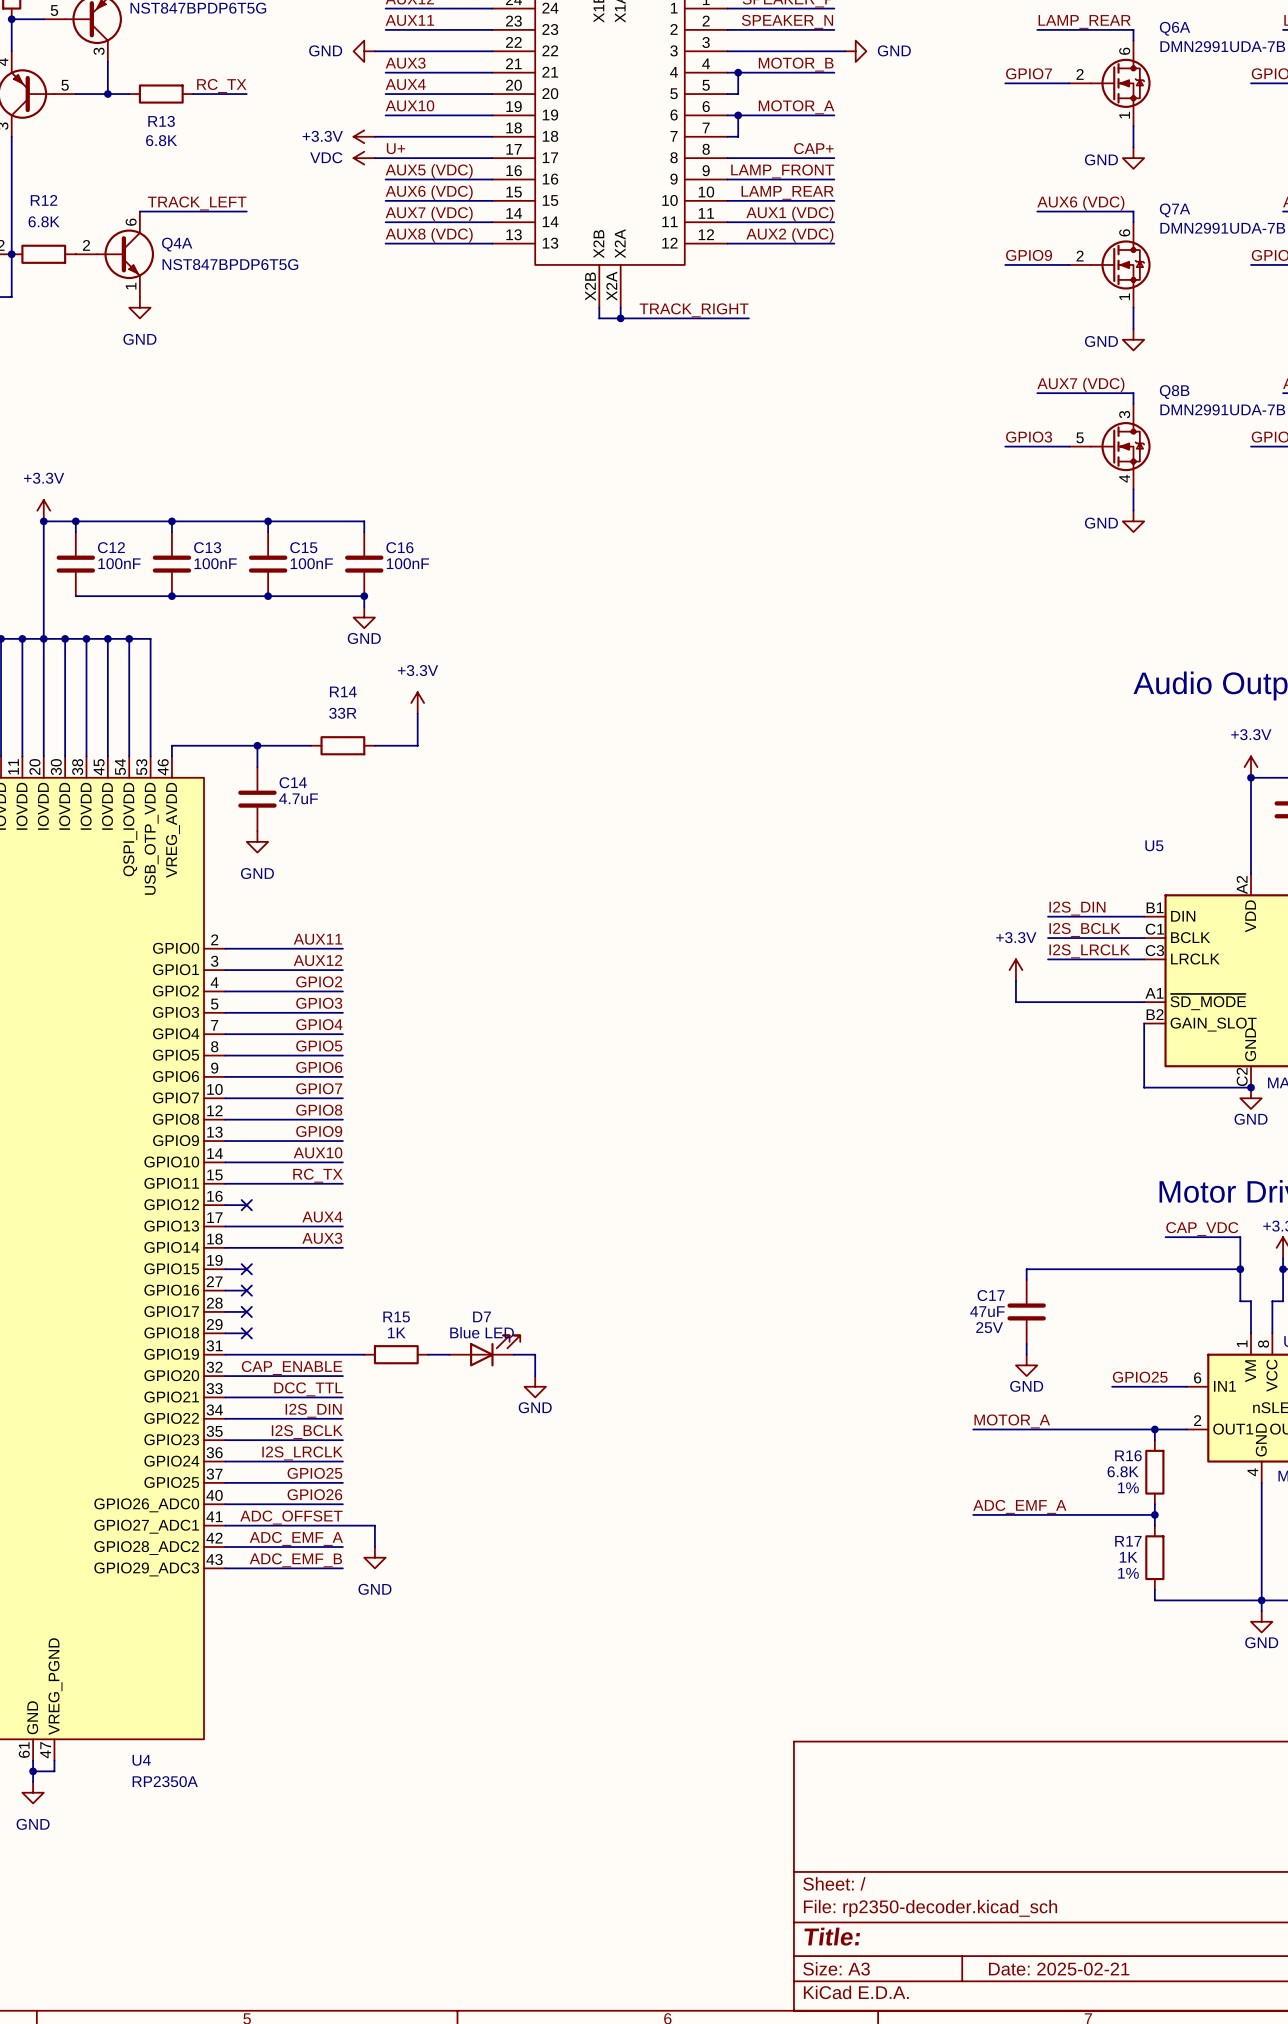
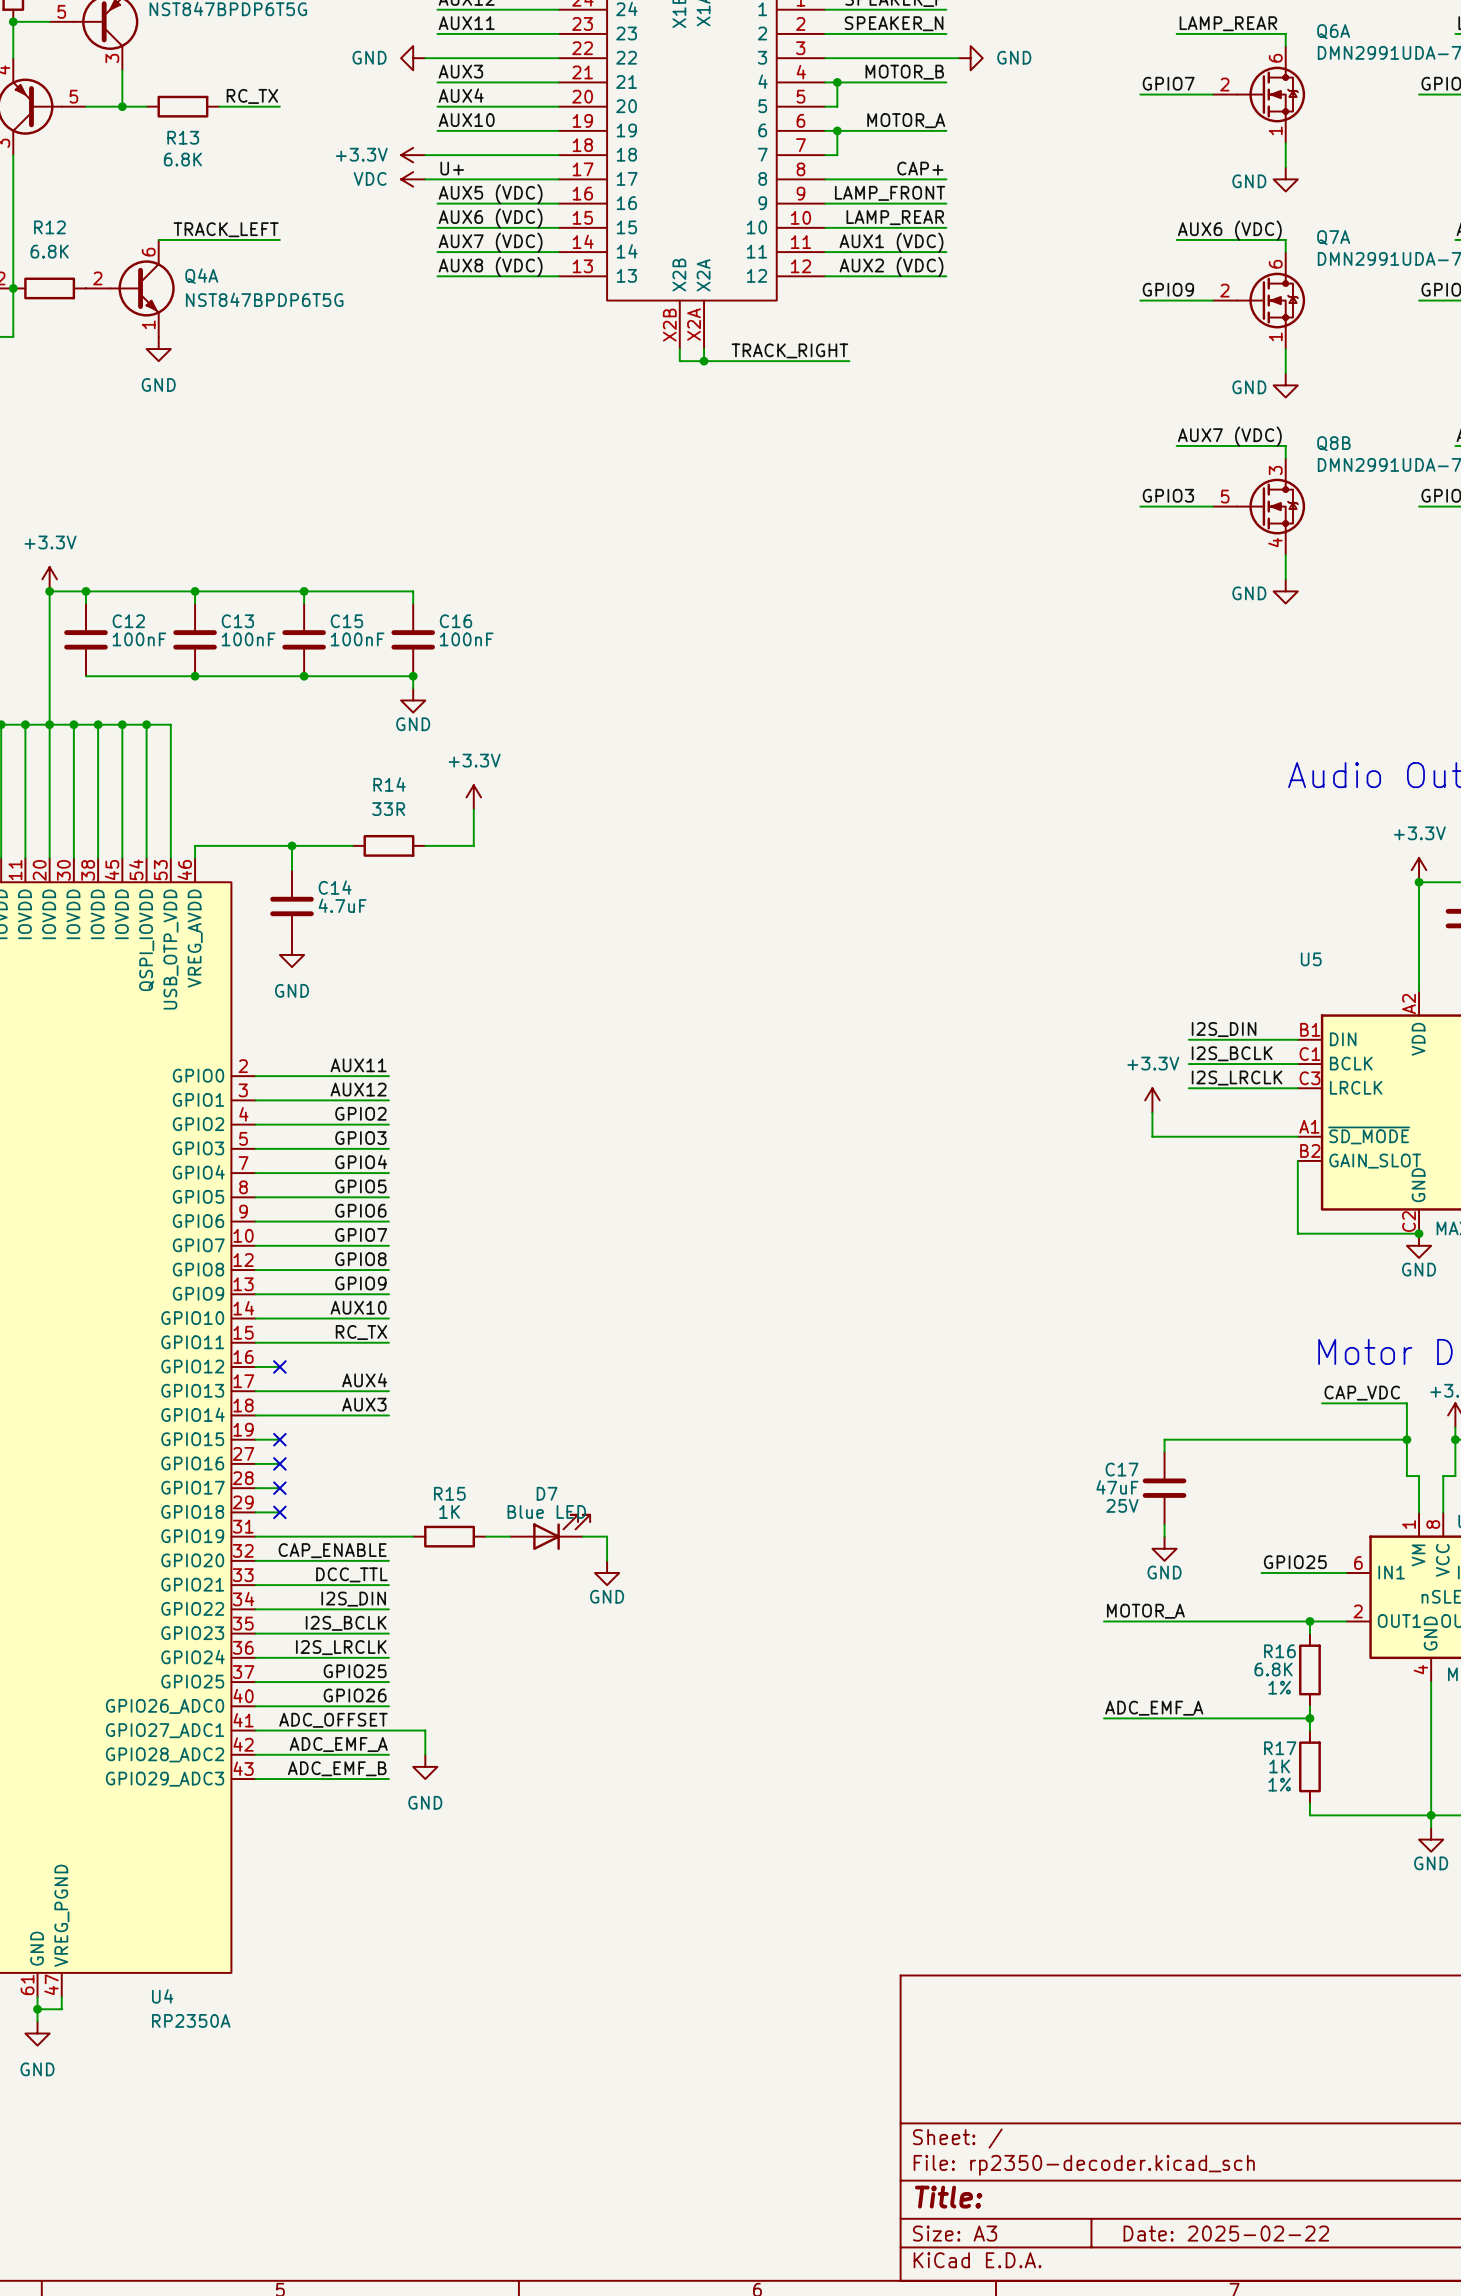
title block: Date: 2025-02-21 (1059, 1969) -> Date: 2025-02-22 (1226, 2233)

